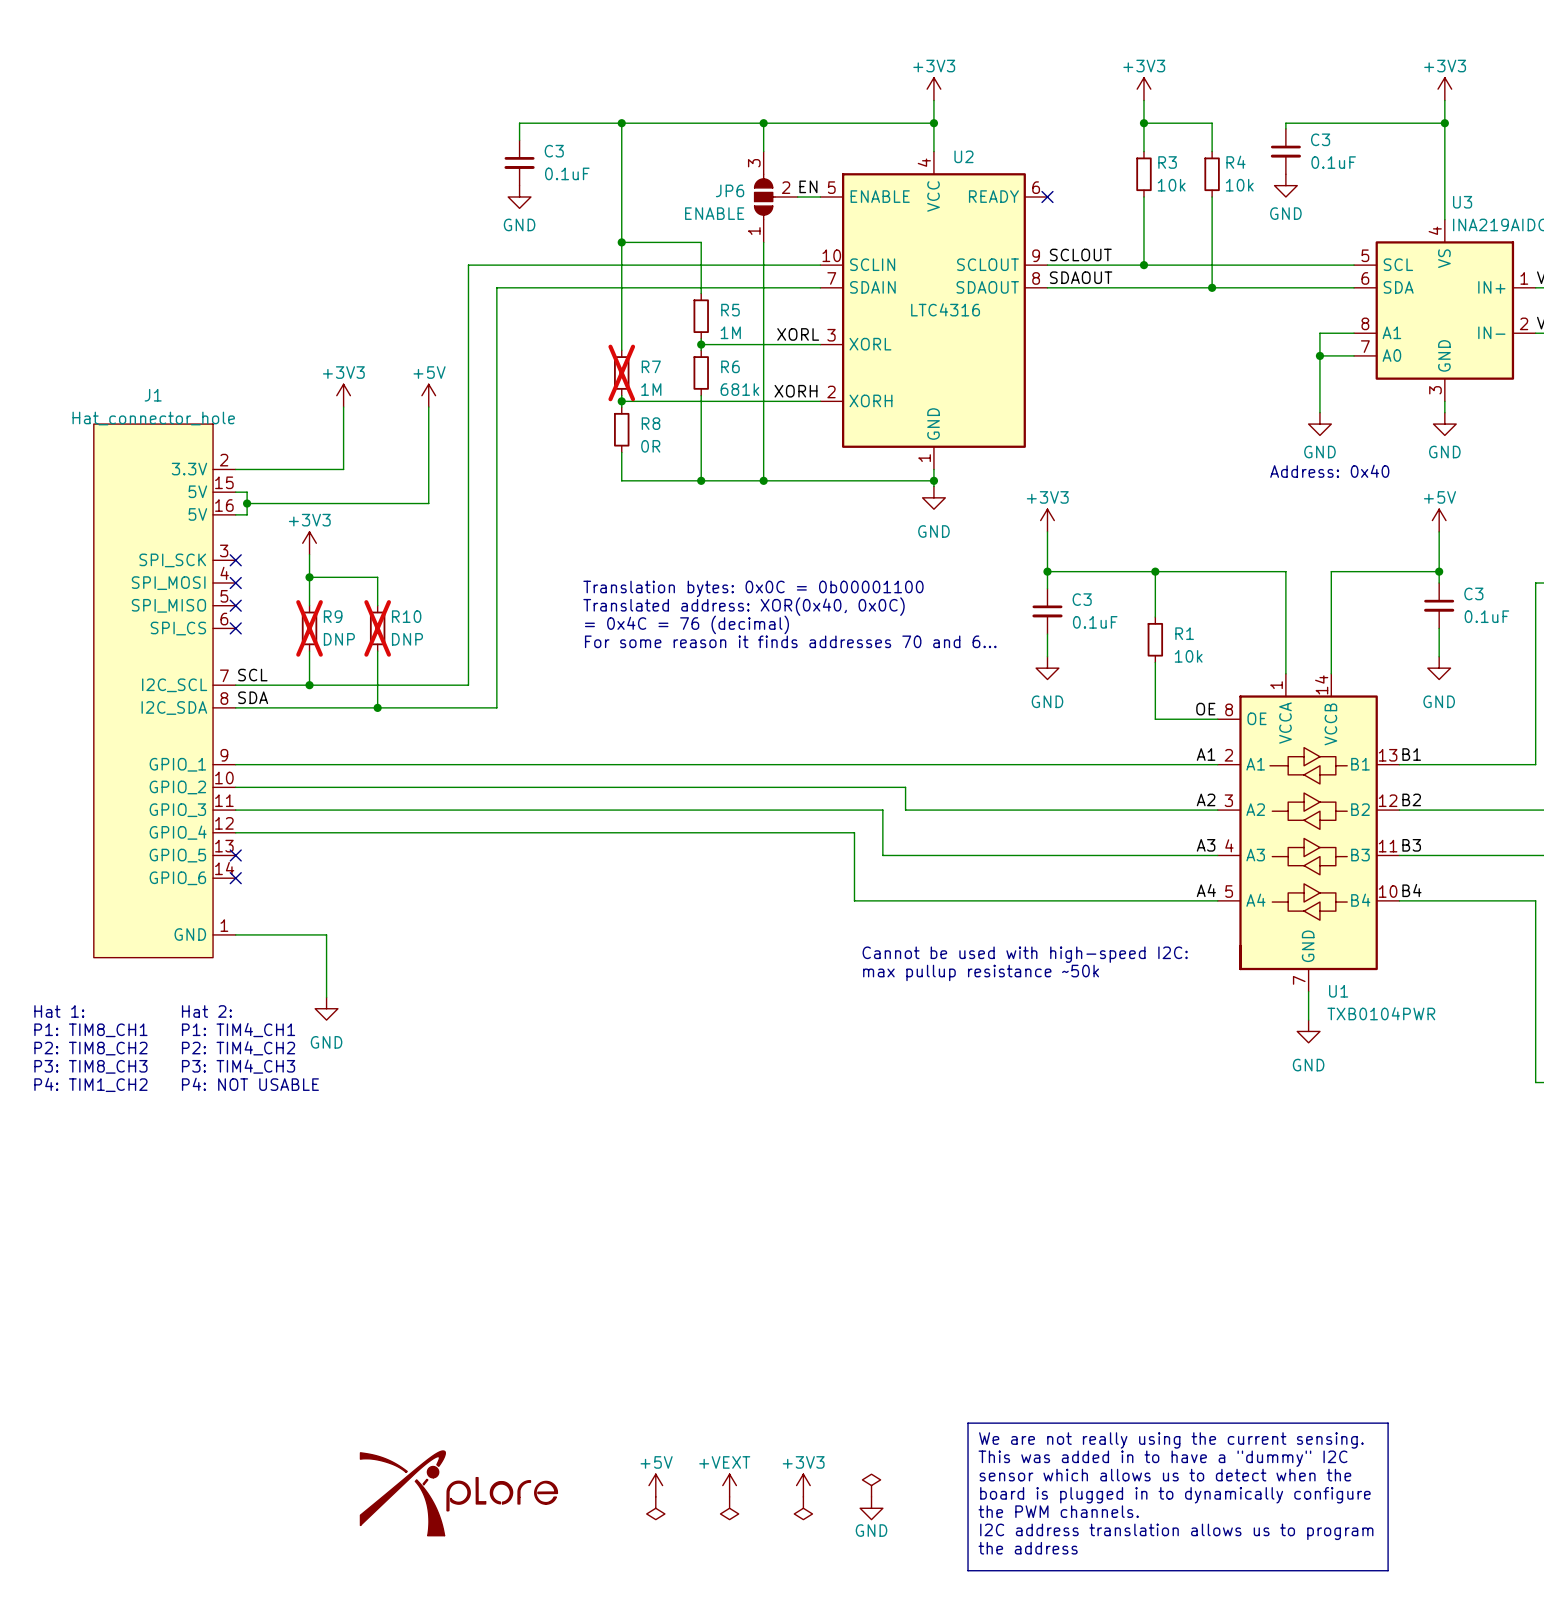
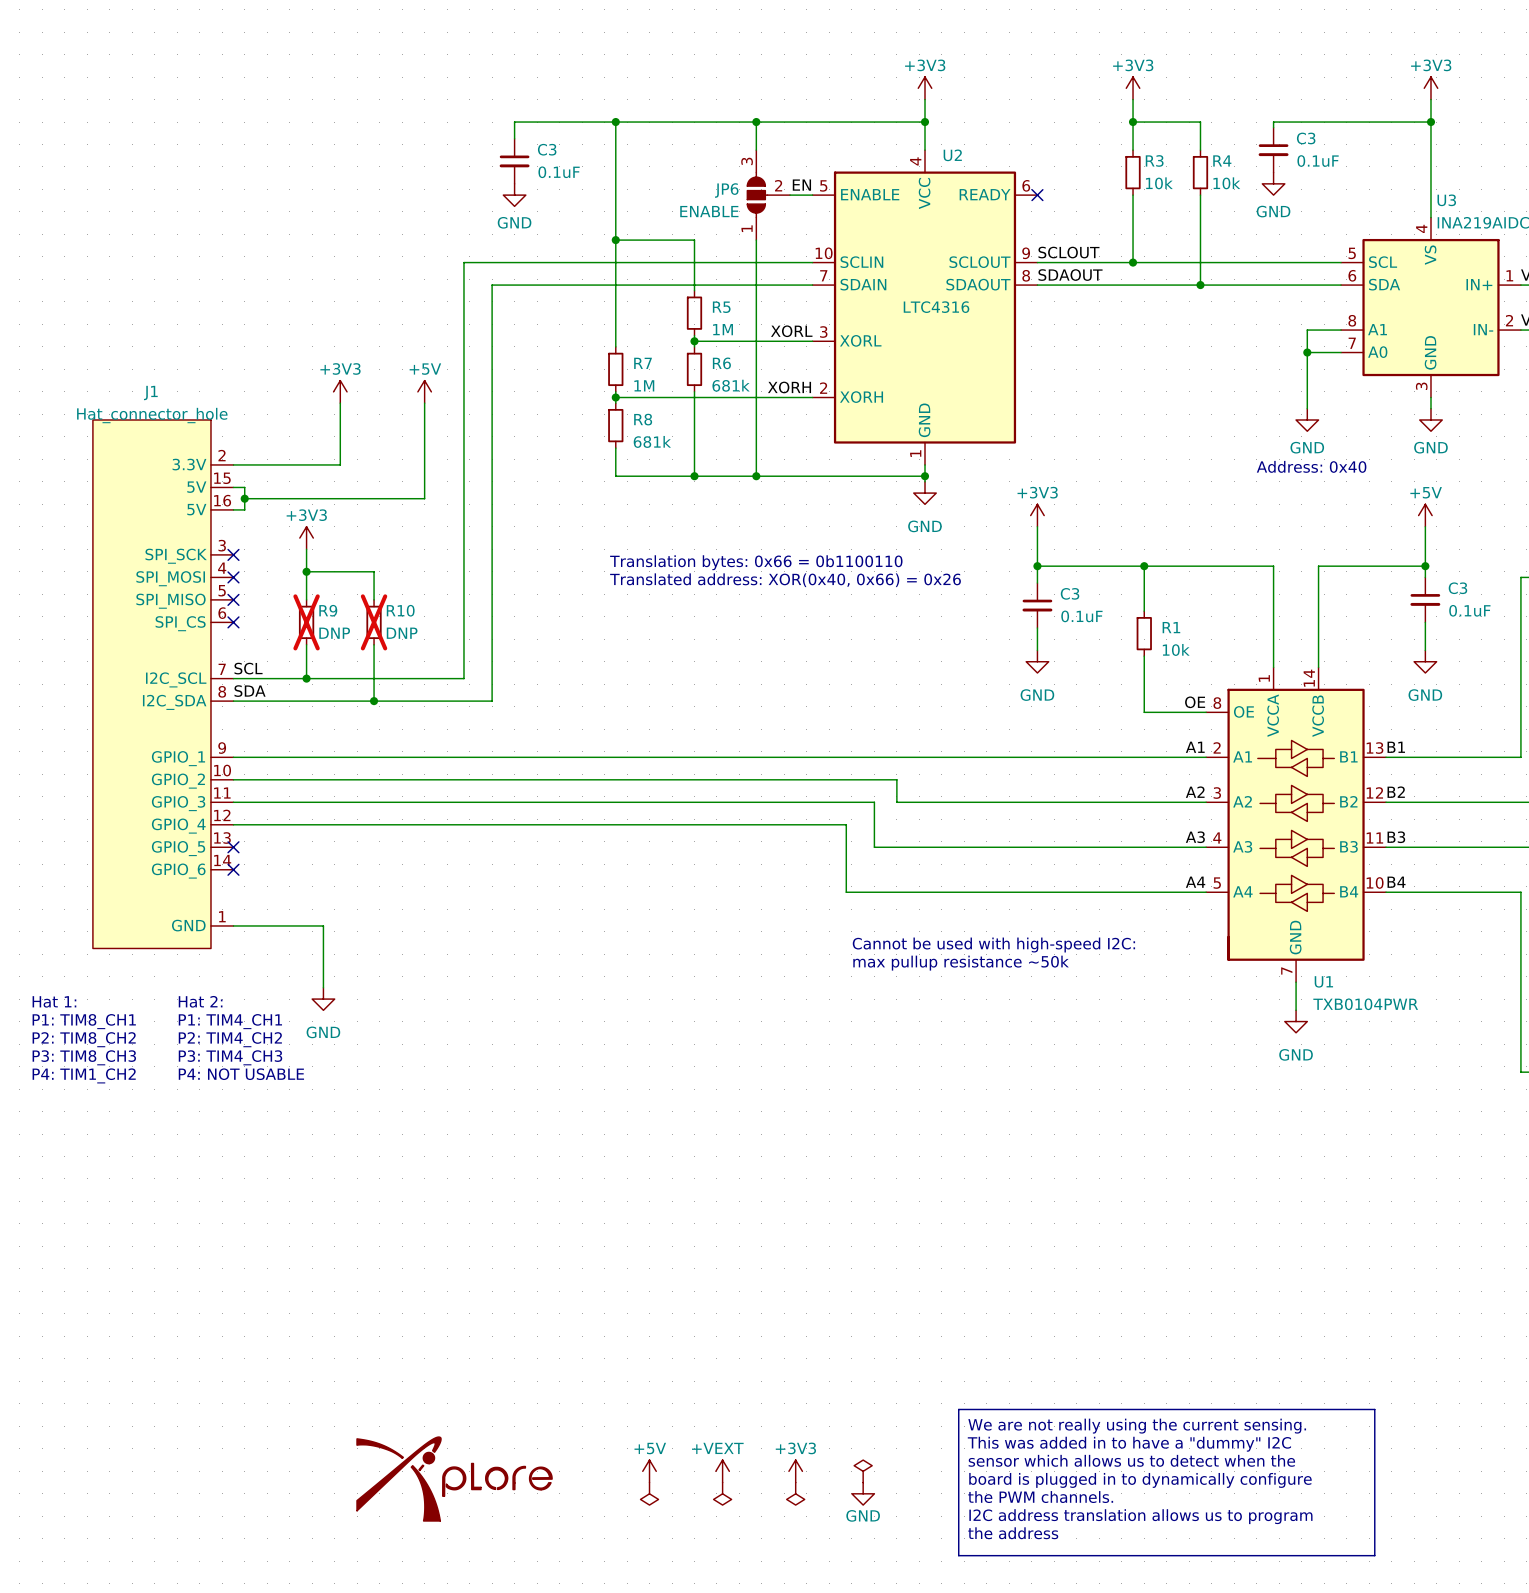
R7 do-not-place cross: (621, 372) -> none
R8 value: 0R (650, 446) -> 681k (652, 441)
text: Translation bytes: 0x0C = 0b00001100 (753, 588) -> Translation bytes: 0x66 = 0b1100110 (756, 562)
text: Translated address: XOR(0x40, 0x0C) (744, 606) -> Translated address: XOR(0x40, 0x66) = 0x26 (785, 580)
text: = 0x4C = 76 (decimal) (686, 624) -> none
text: For some reason it finds addresses 70 and 6... (790, 641) -> none

